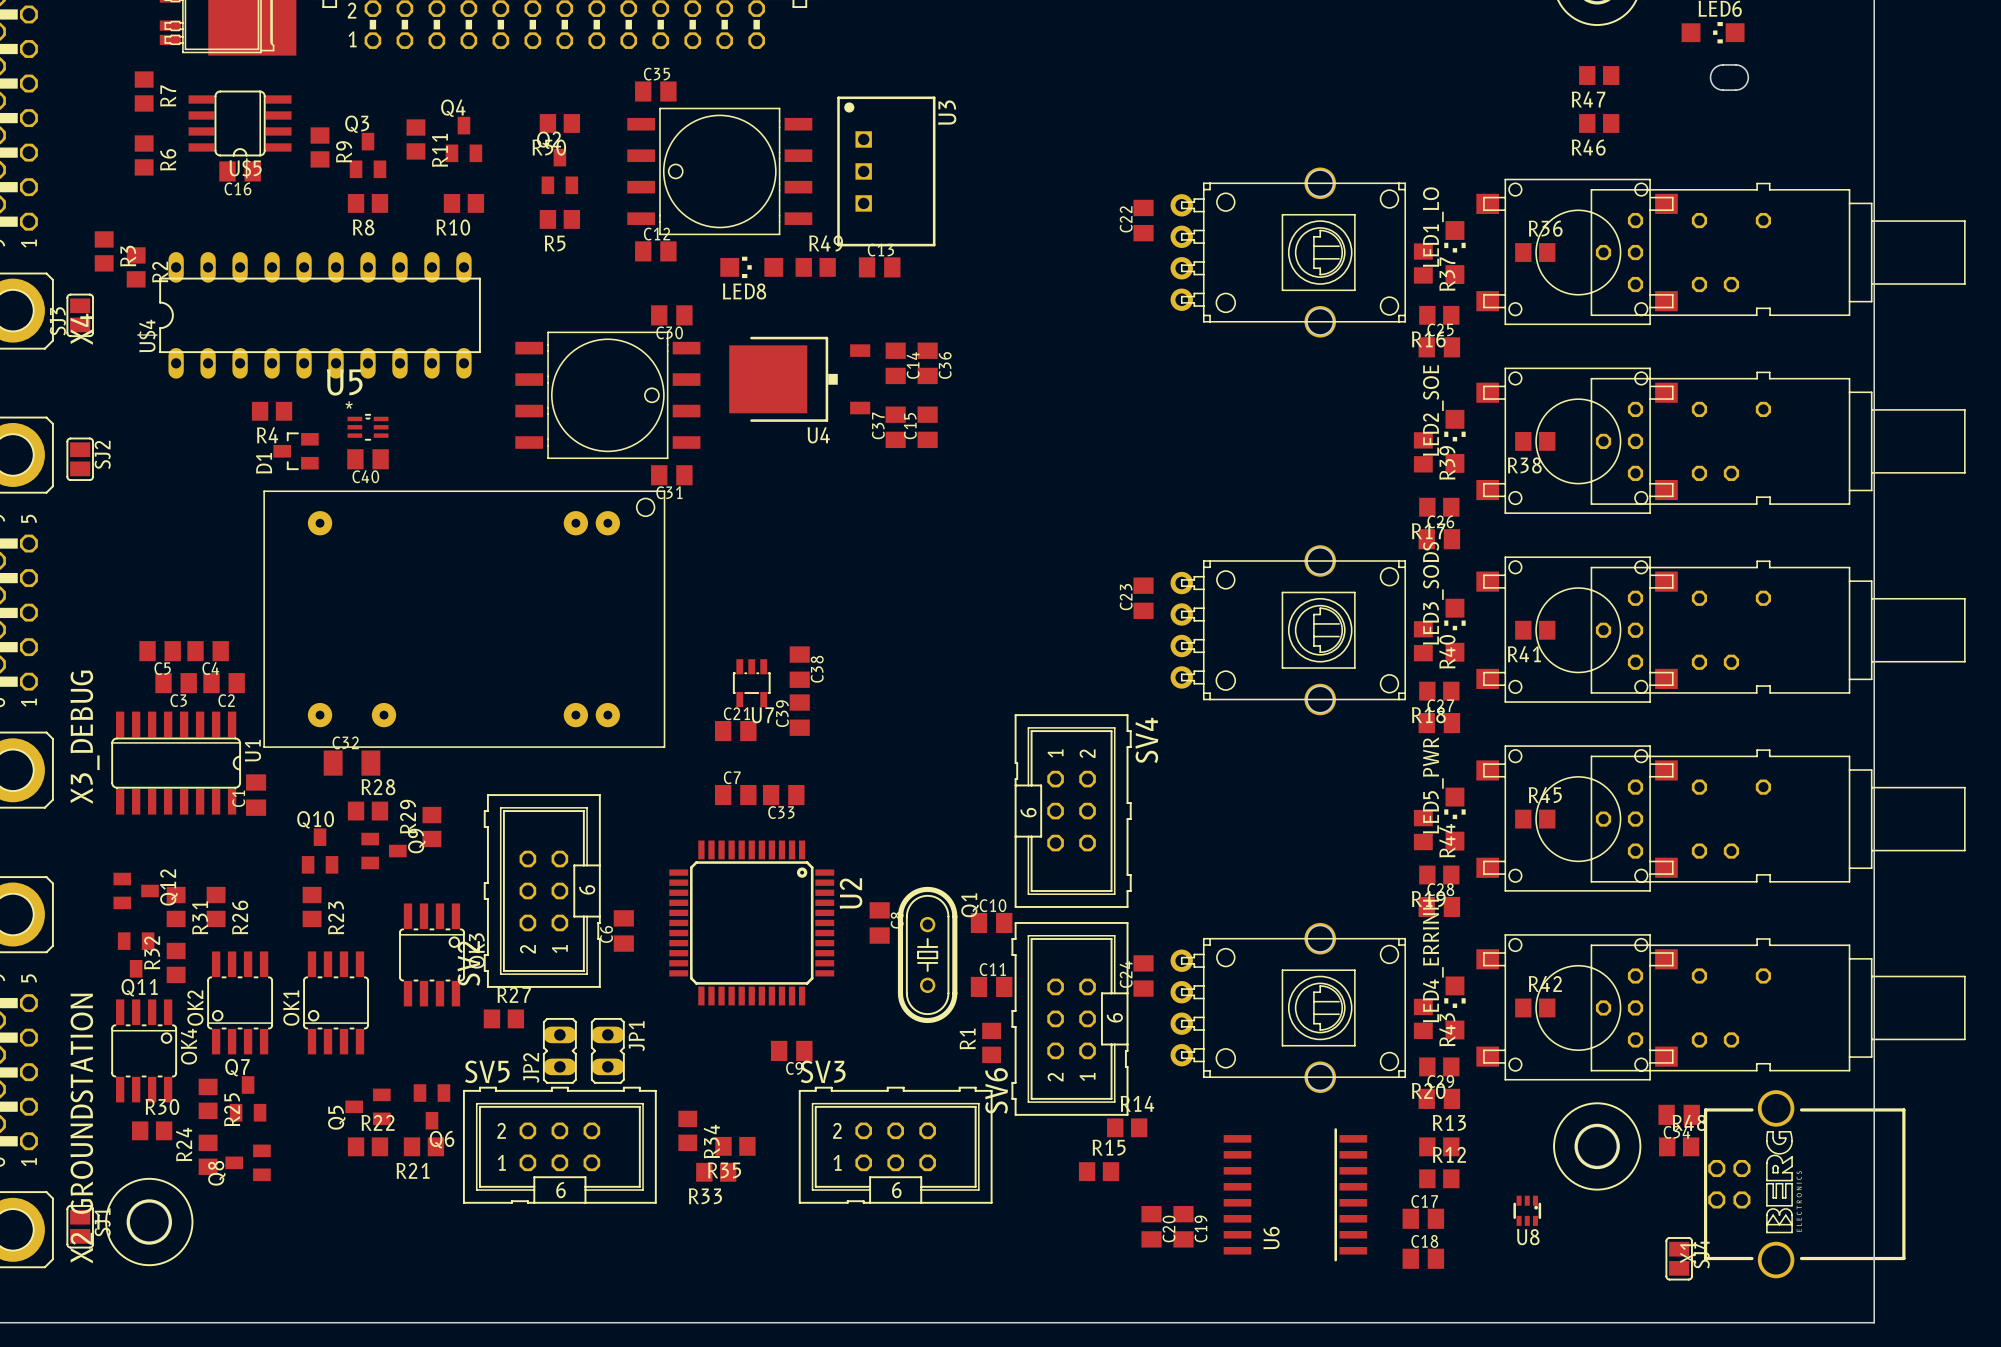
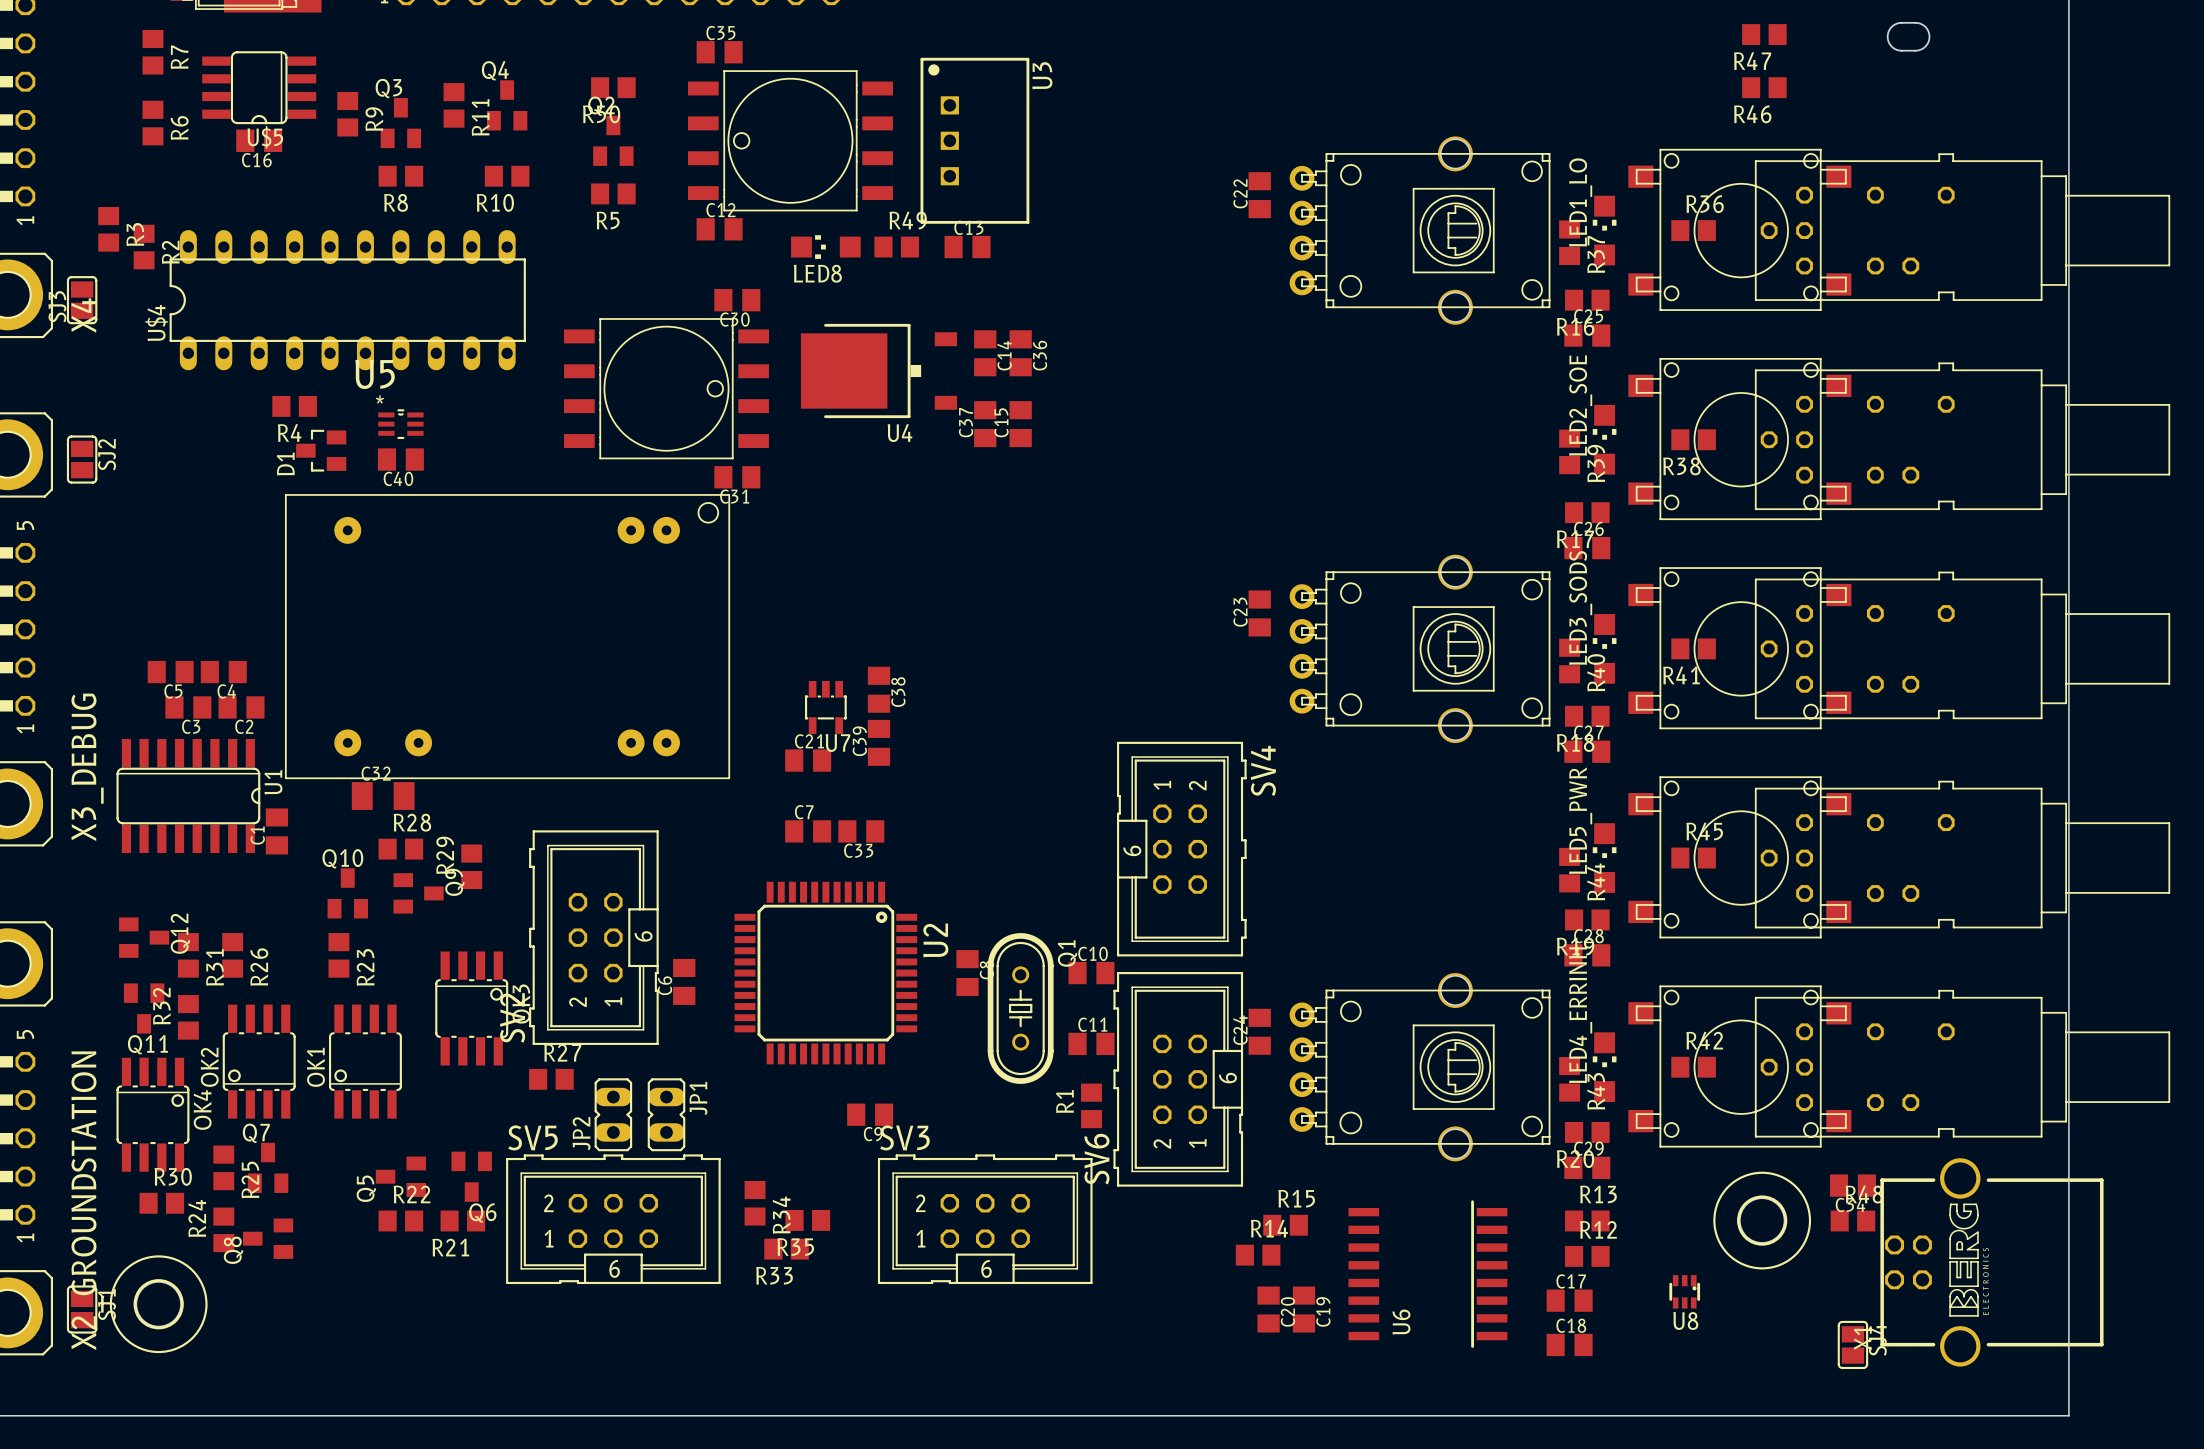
R14 position: (1127, 1127) -> (1258, 1255)
R15 position: (1099, 1171) -> (1285, 1225)

